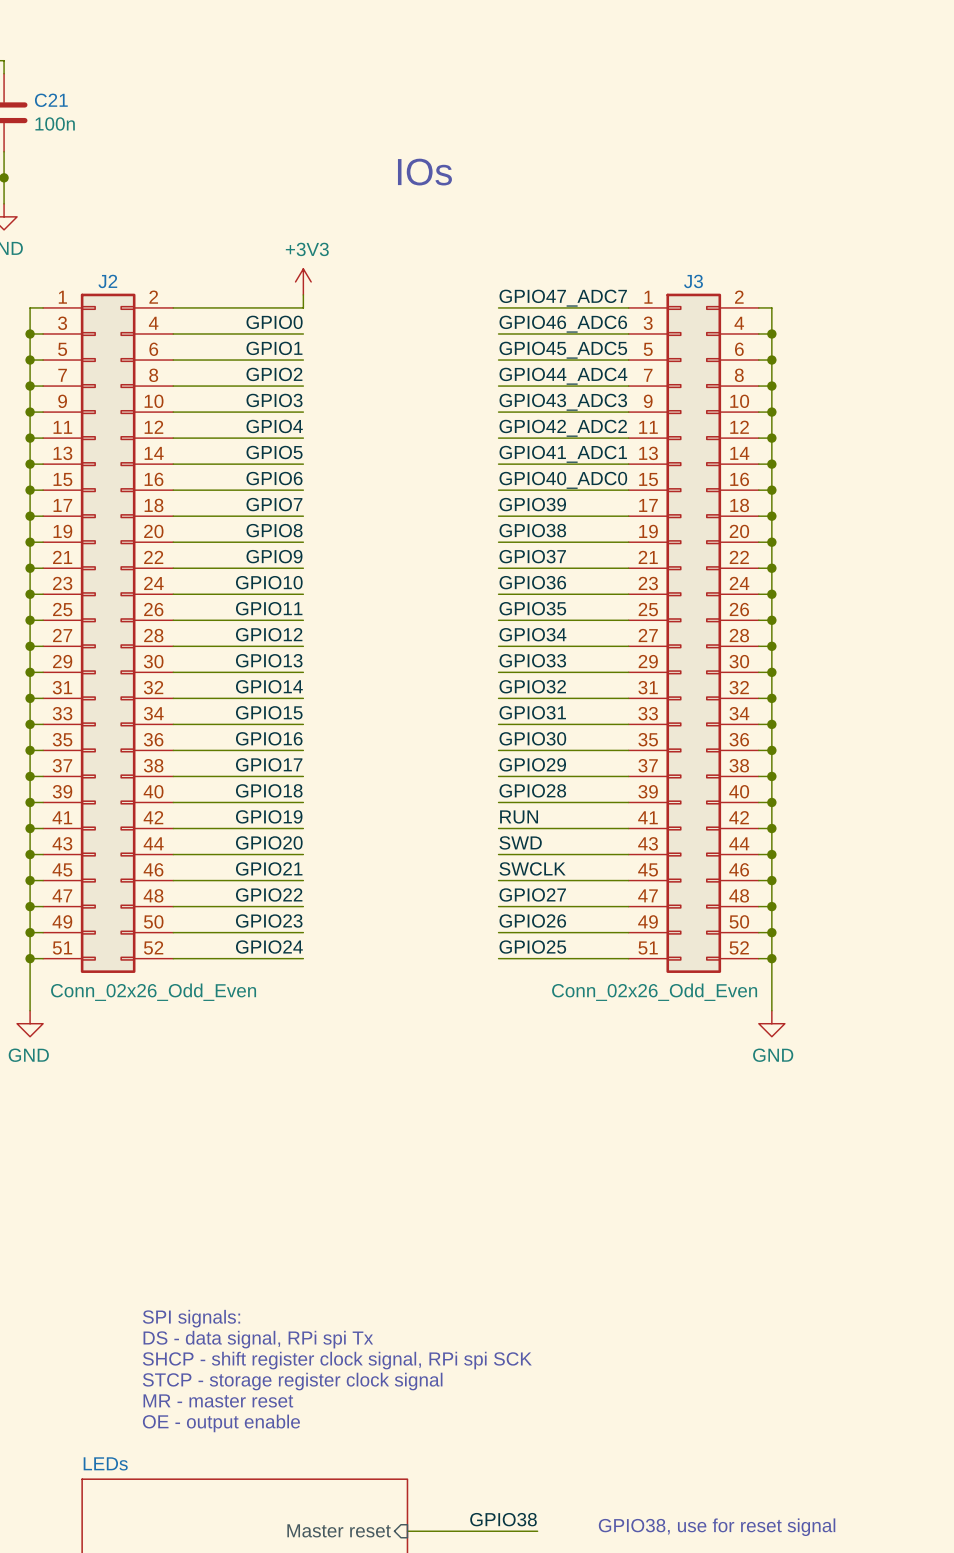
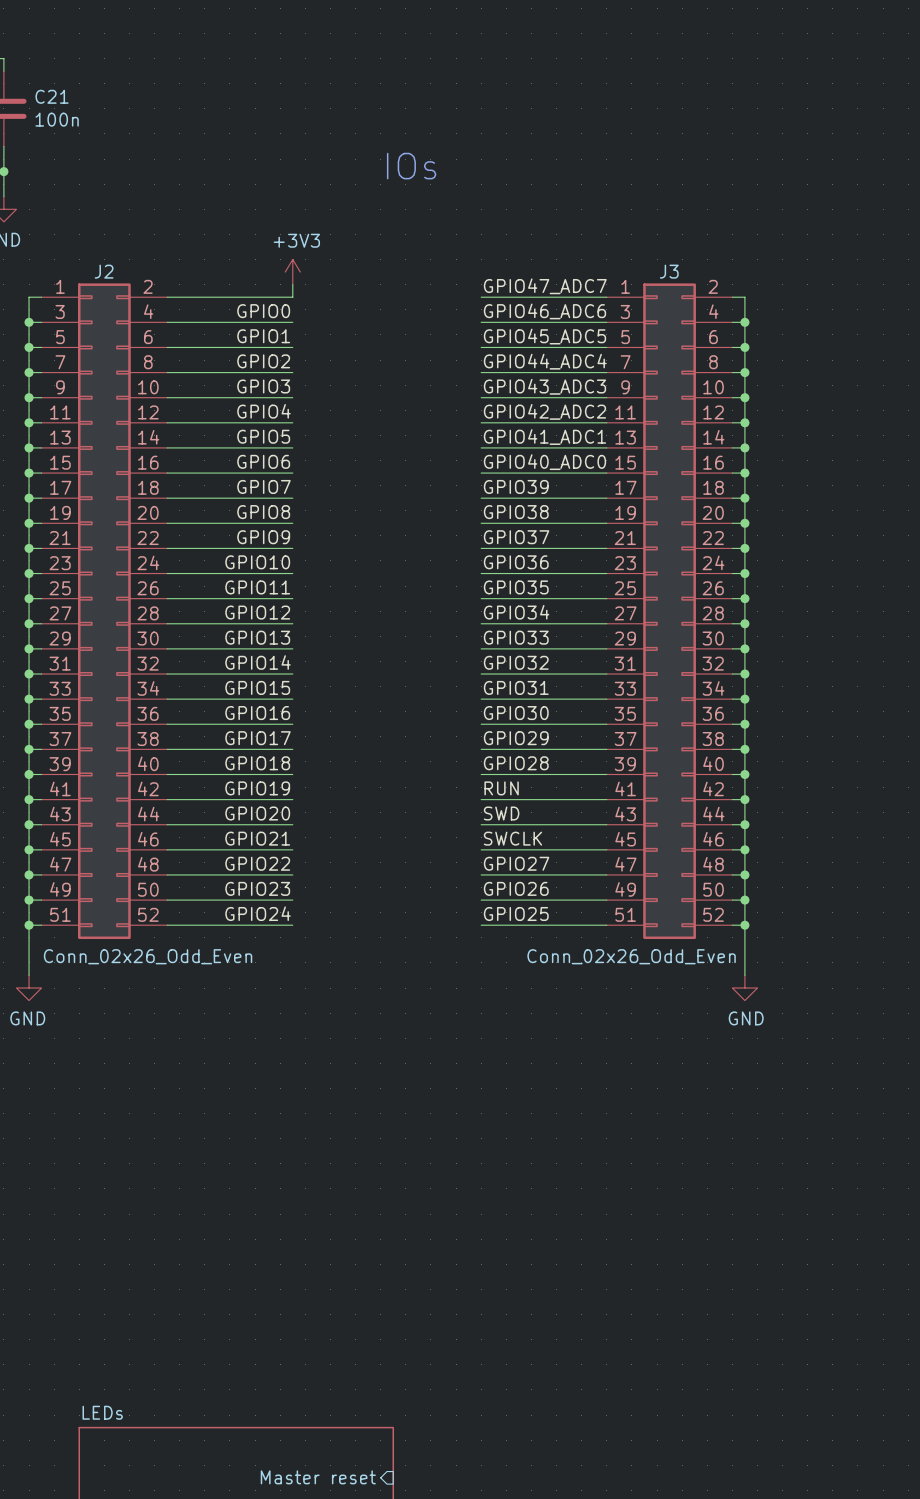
text: SPI signals: (191, 1318) -> none
text: DS - data signal, RPi spi Tx (258, 1339) -> none
text: SHCP - shift register clock signal, RPi spi SCK (337, 1360) -> none
text: STCP - storage register clock signal (292, 1381) -> none
text: MR - master reset (218, 1400) -> none
text: OE - output enable (221, 1423) -> none
label: GPIO38 (503, 1519) -> none
text: GPIO38, use for reset signal (717, 1527) -> none
wire: (407, 1531) (537, 1531) -> none

